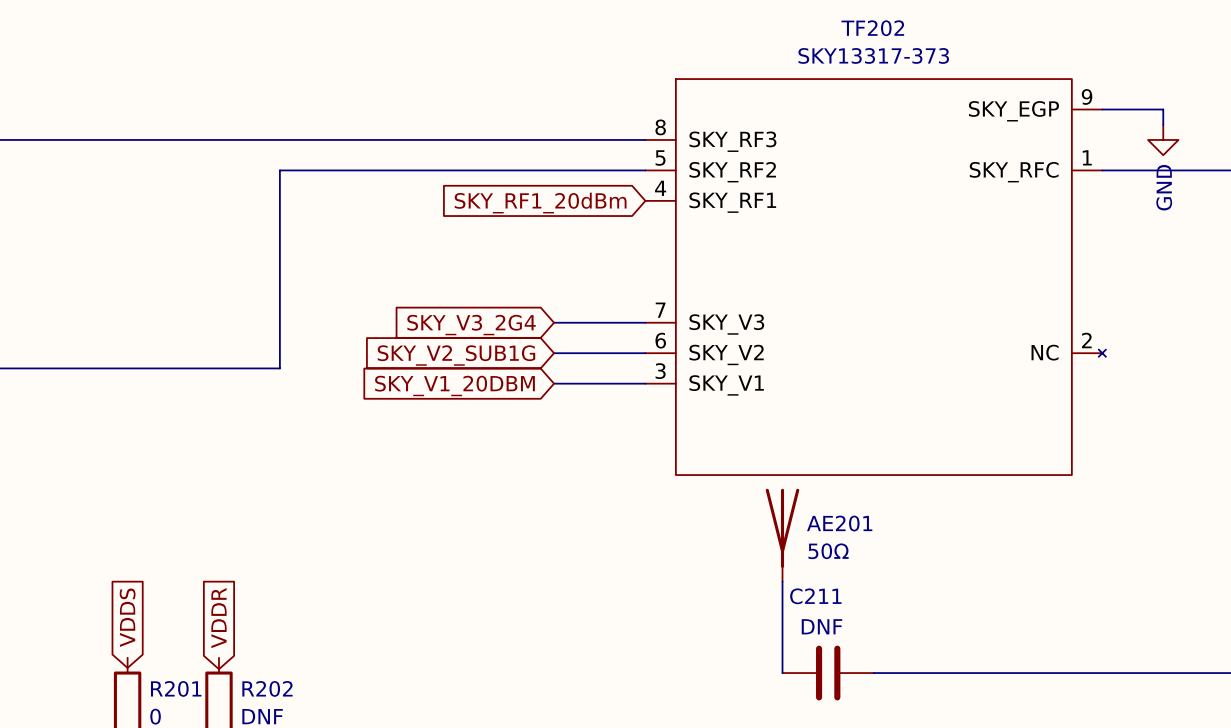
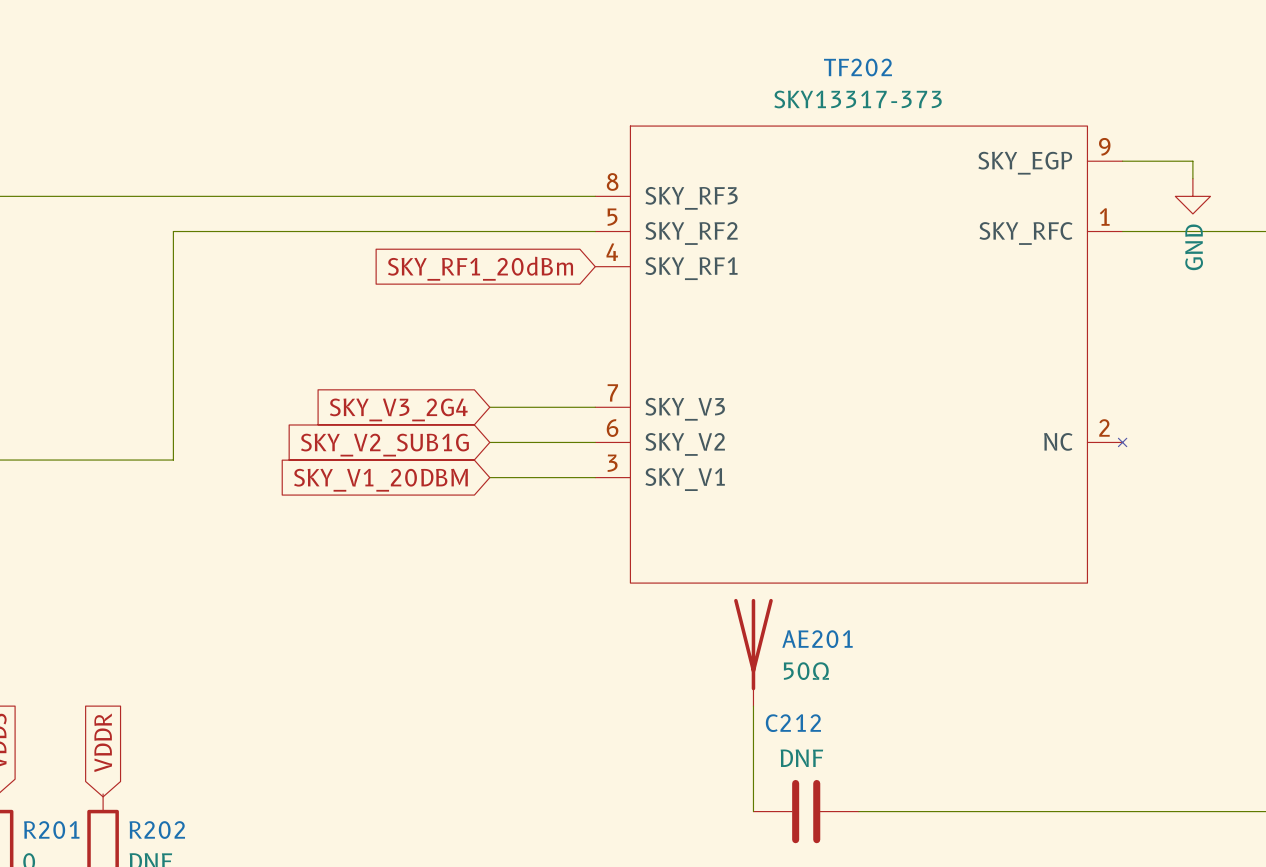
C211 name: C211 (815, 596) -> C212 (793, 723)

